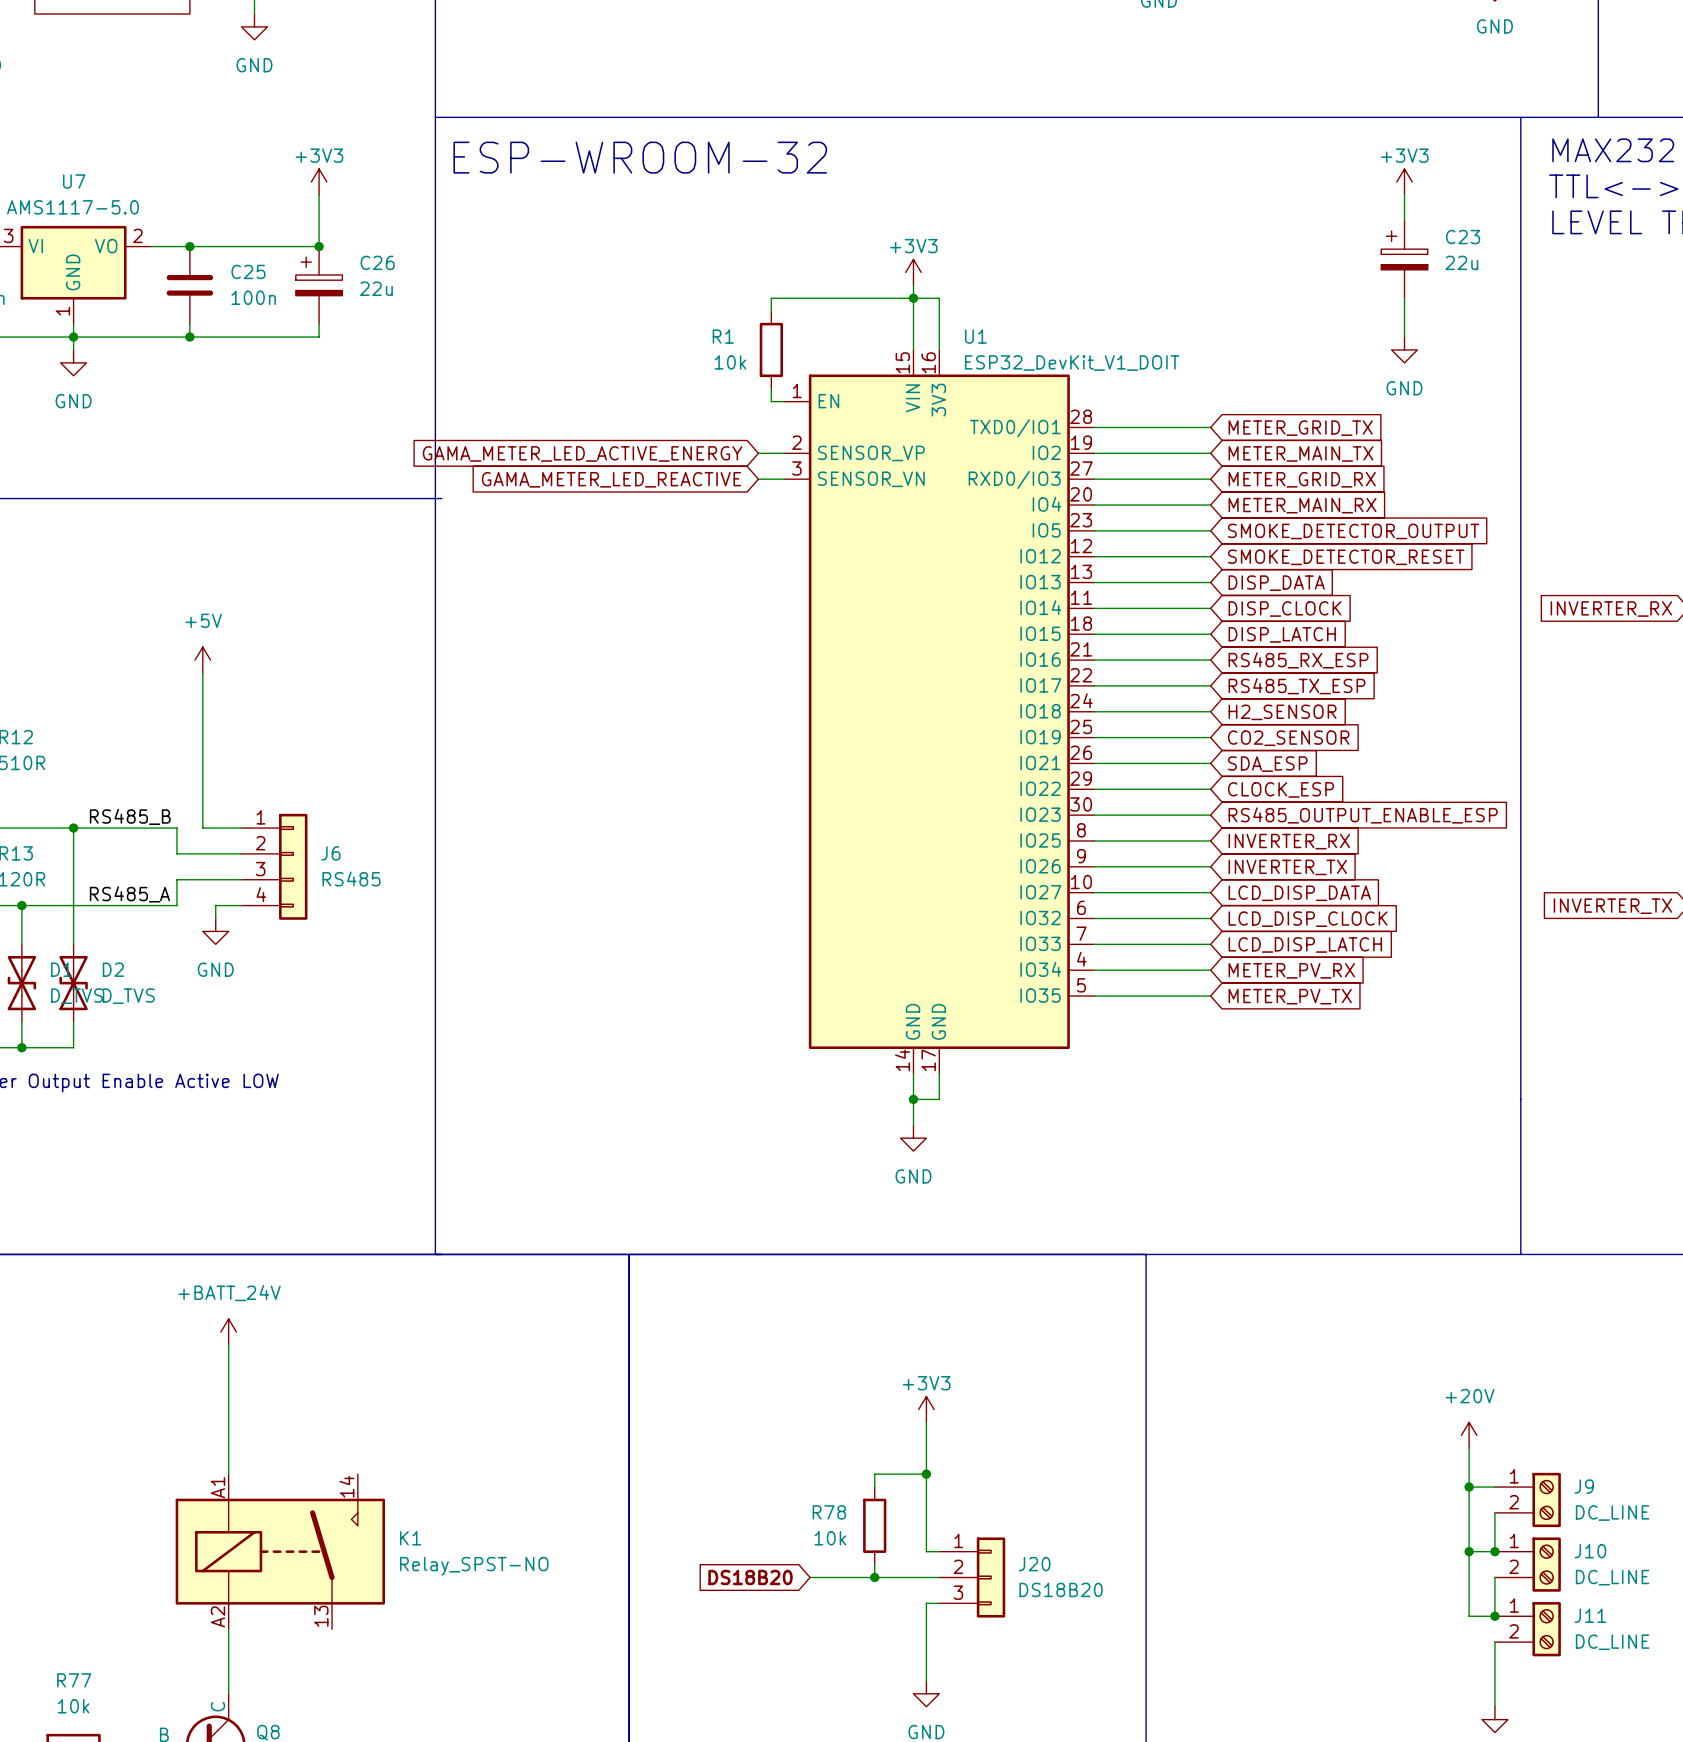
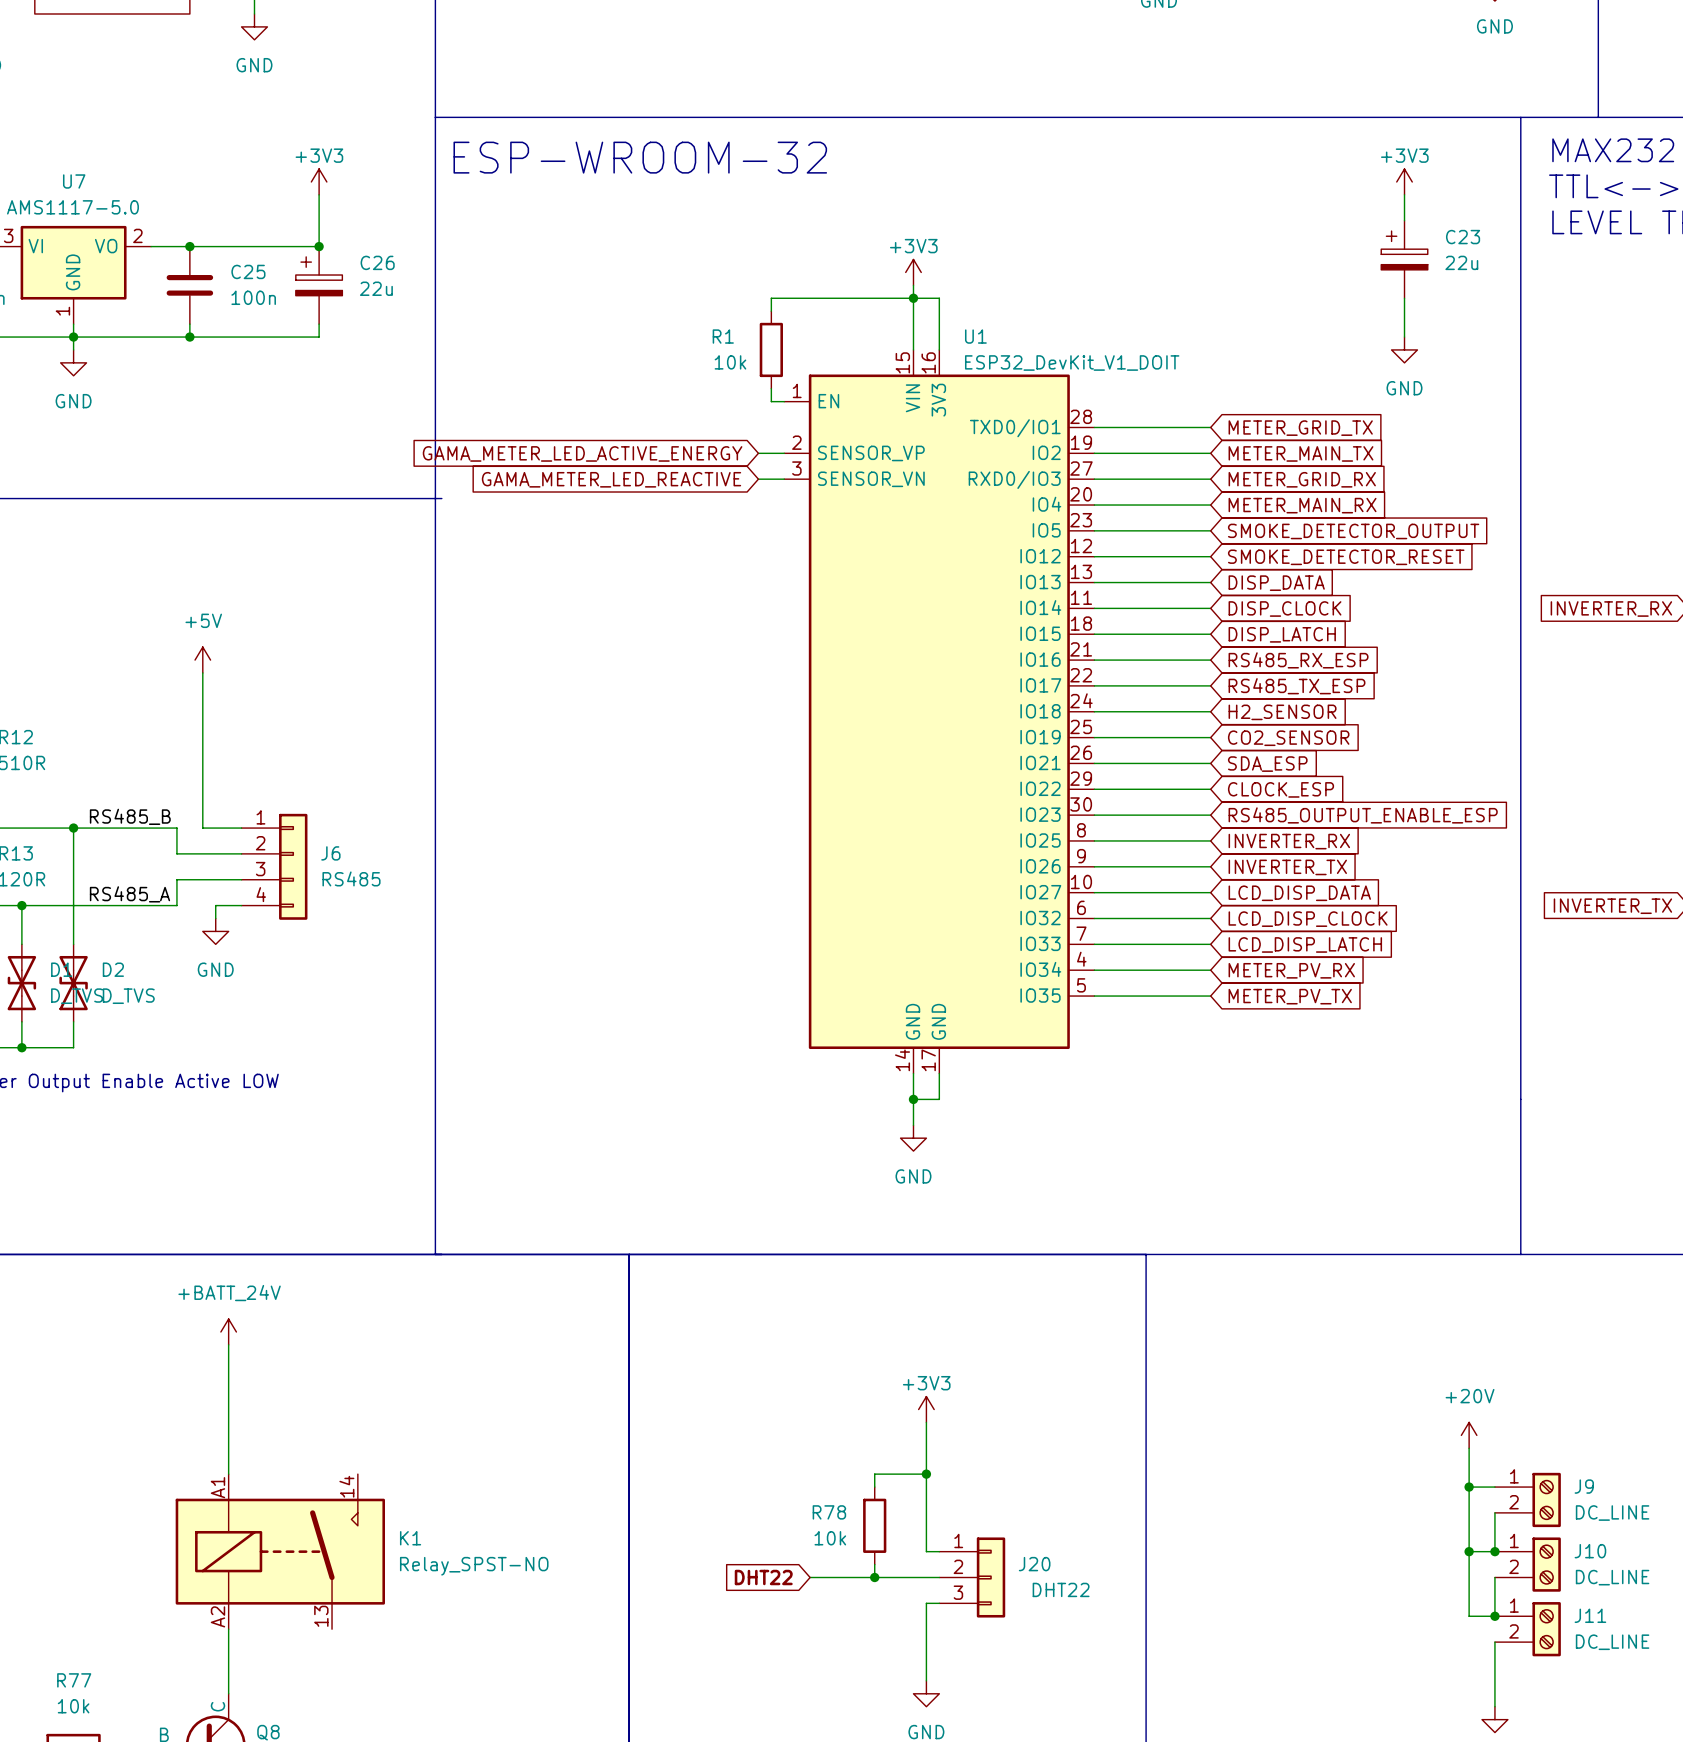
global label: DS18B20 (750, 1577) -> DHT22 (763, 1577)
J20 value: DS18B20 (1061, 1589) -> DHT22 (1061, 1589)

